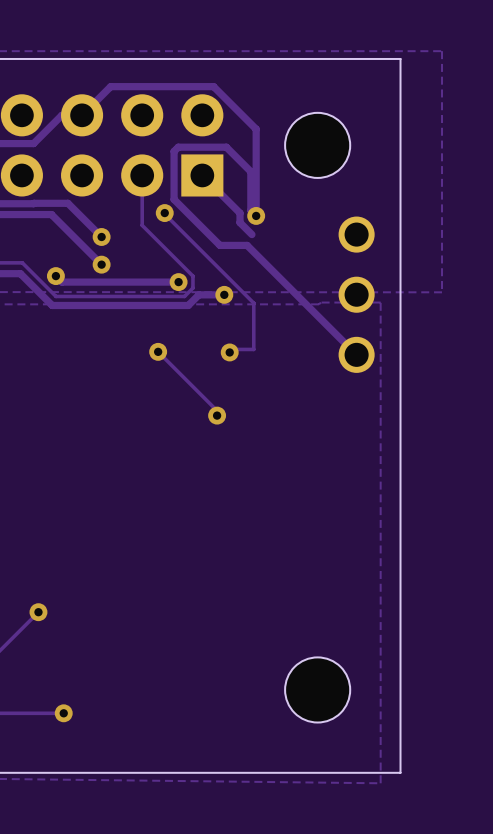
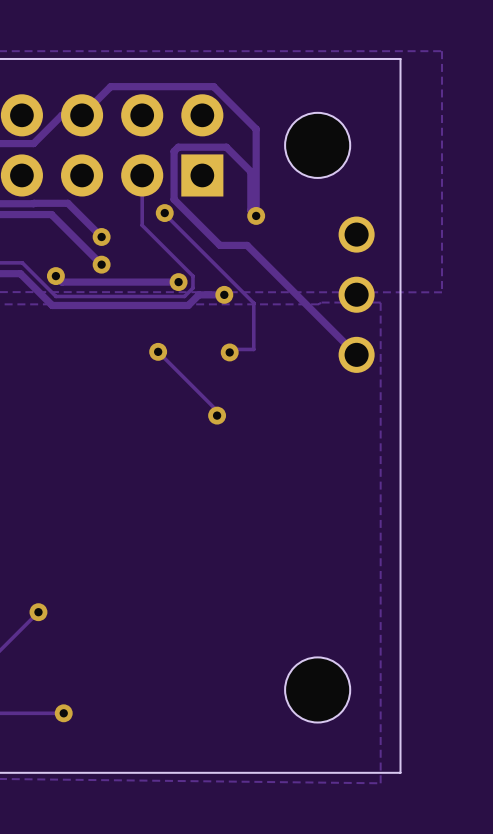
track: (202, 175) (240, 213) (240, 222) (251, 234) -> none

